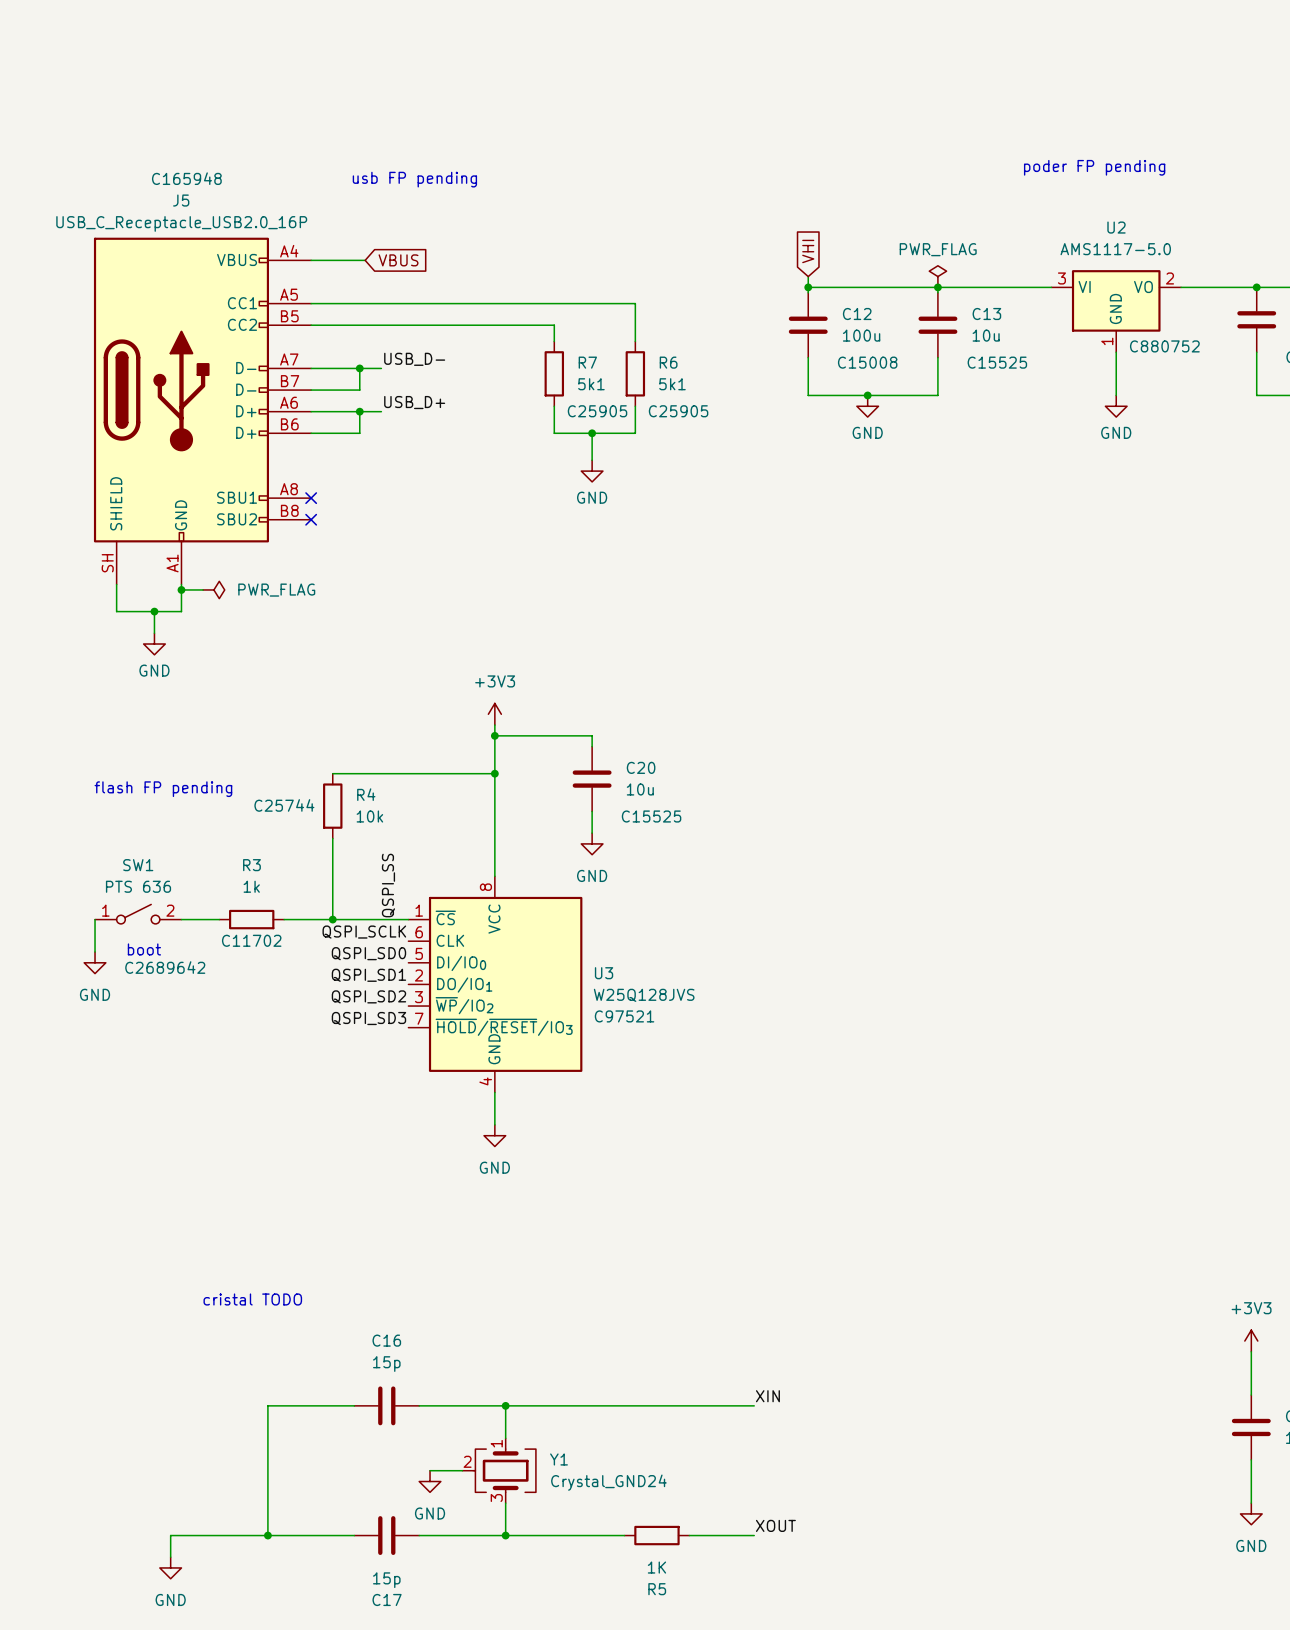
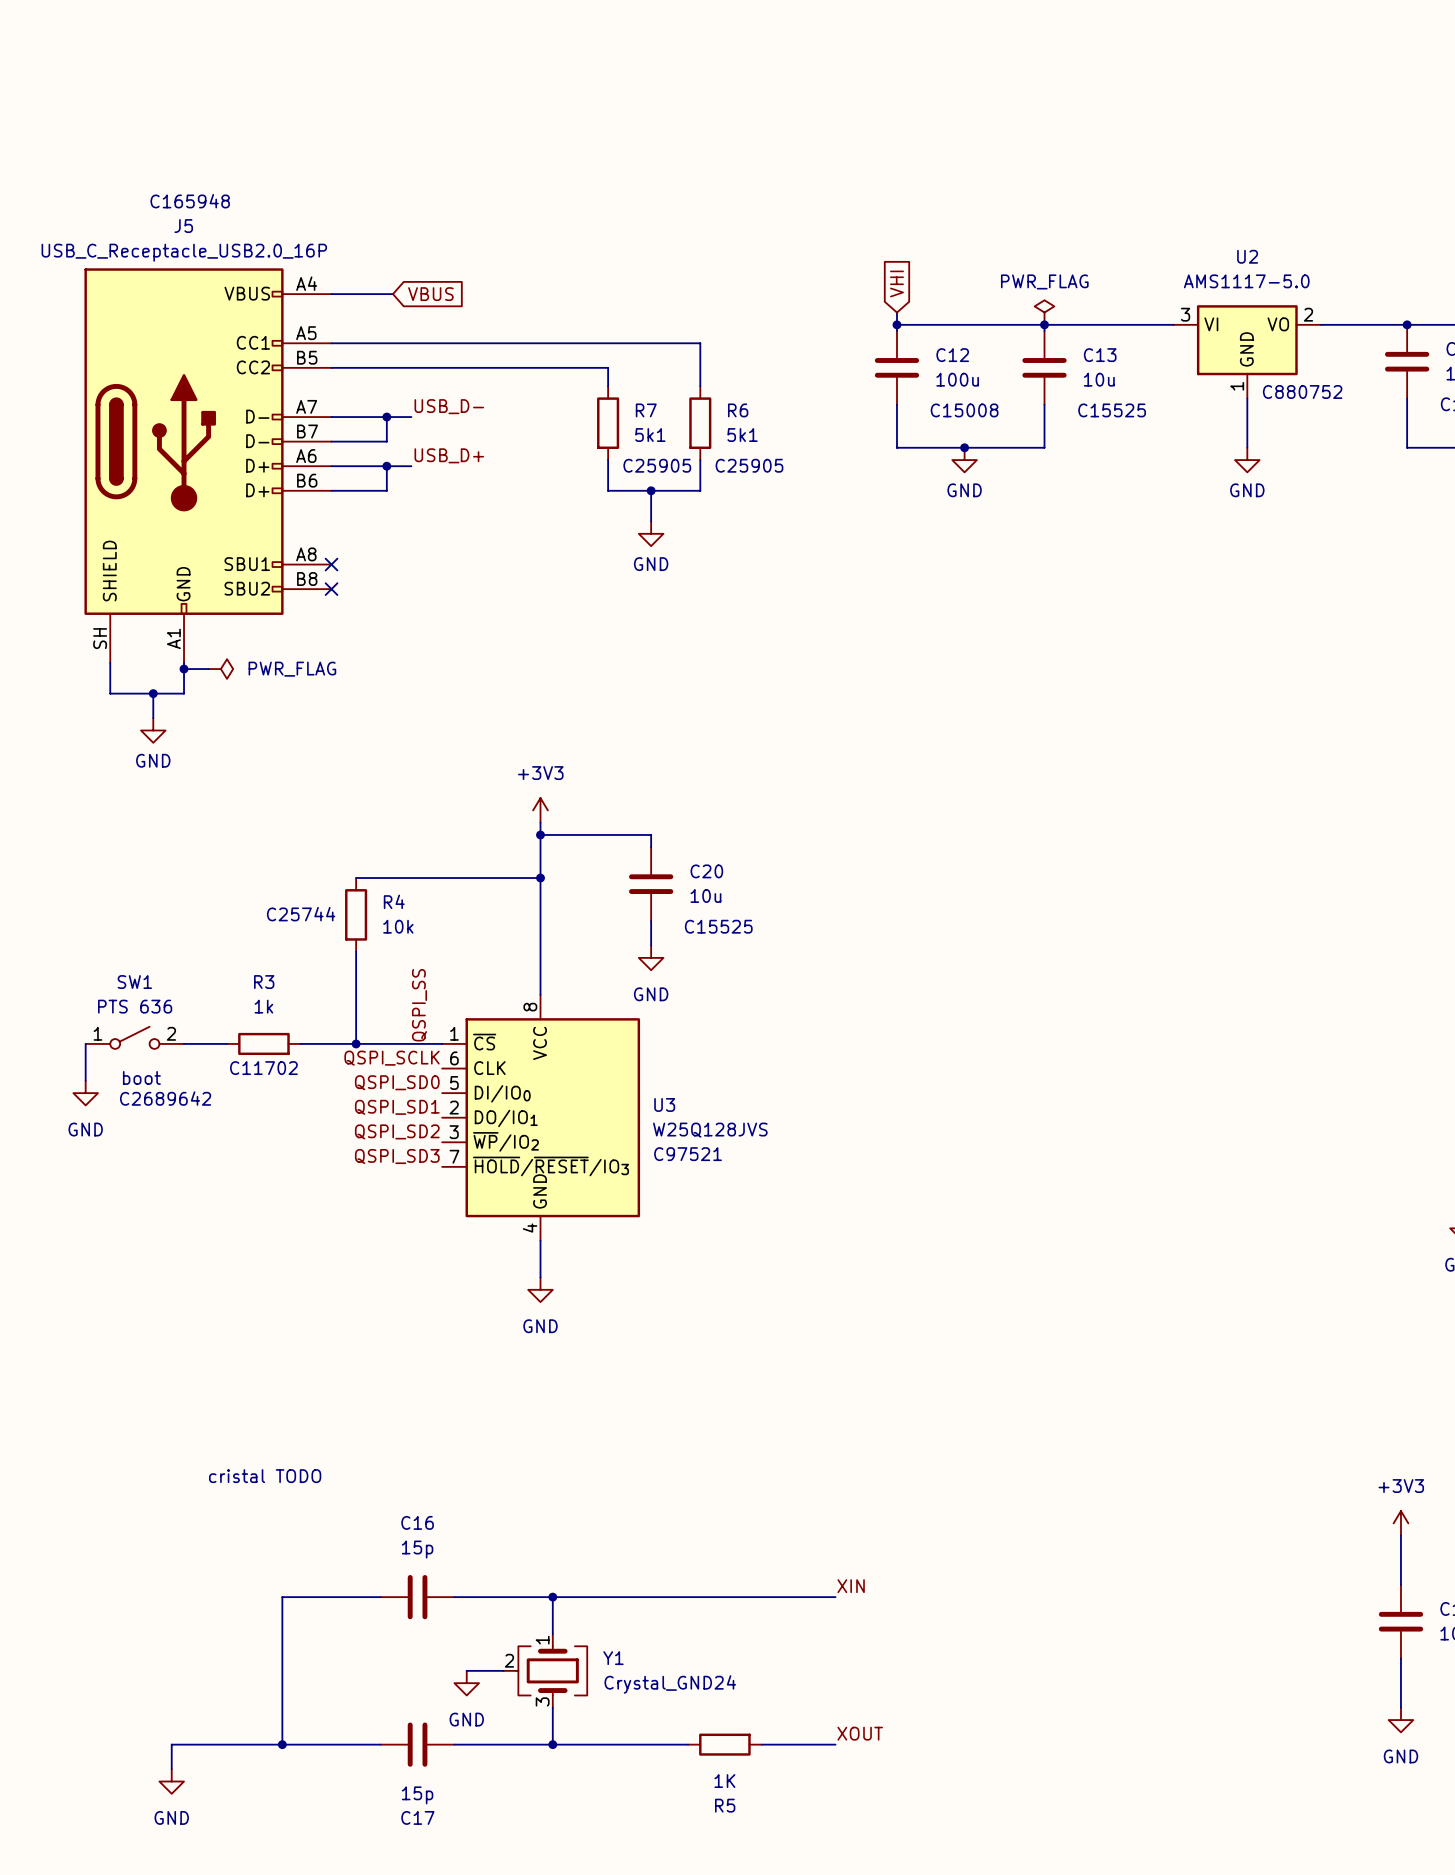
text: poder FP pending (1094, 167) -> none
text: usb FP pending (414, 179) -> none
text: flash FP pending (163, 789) -> none

